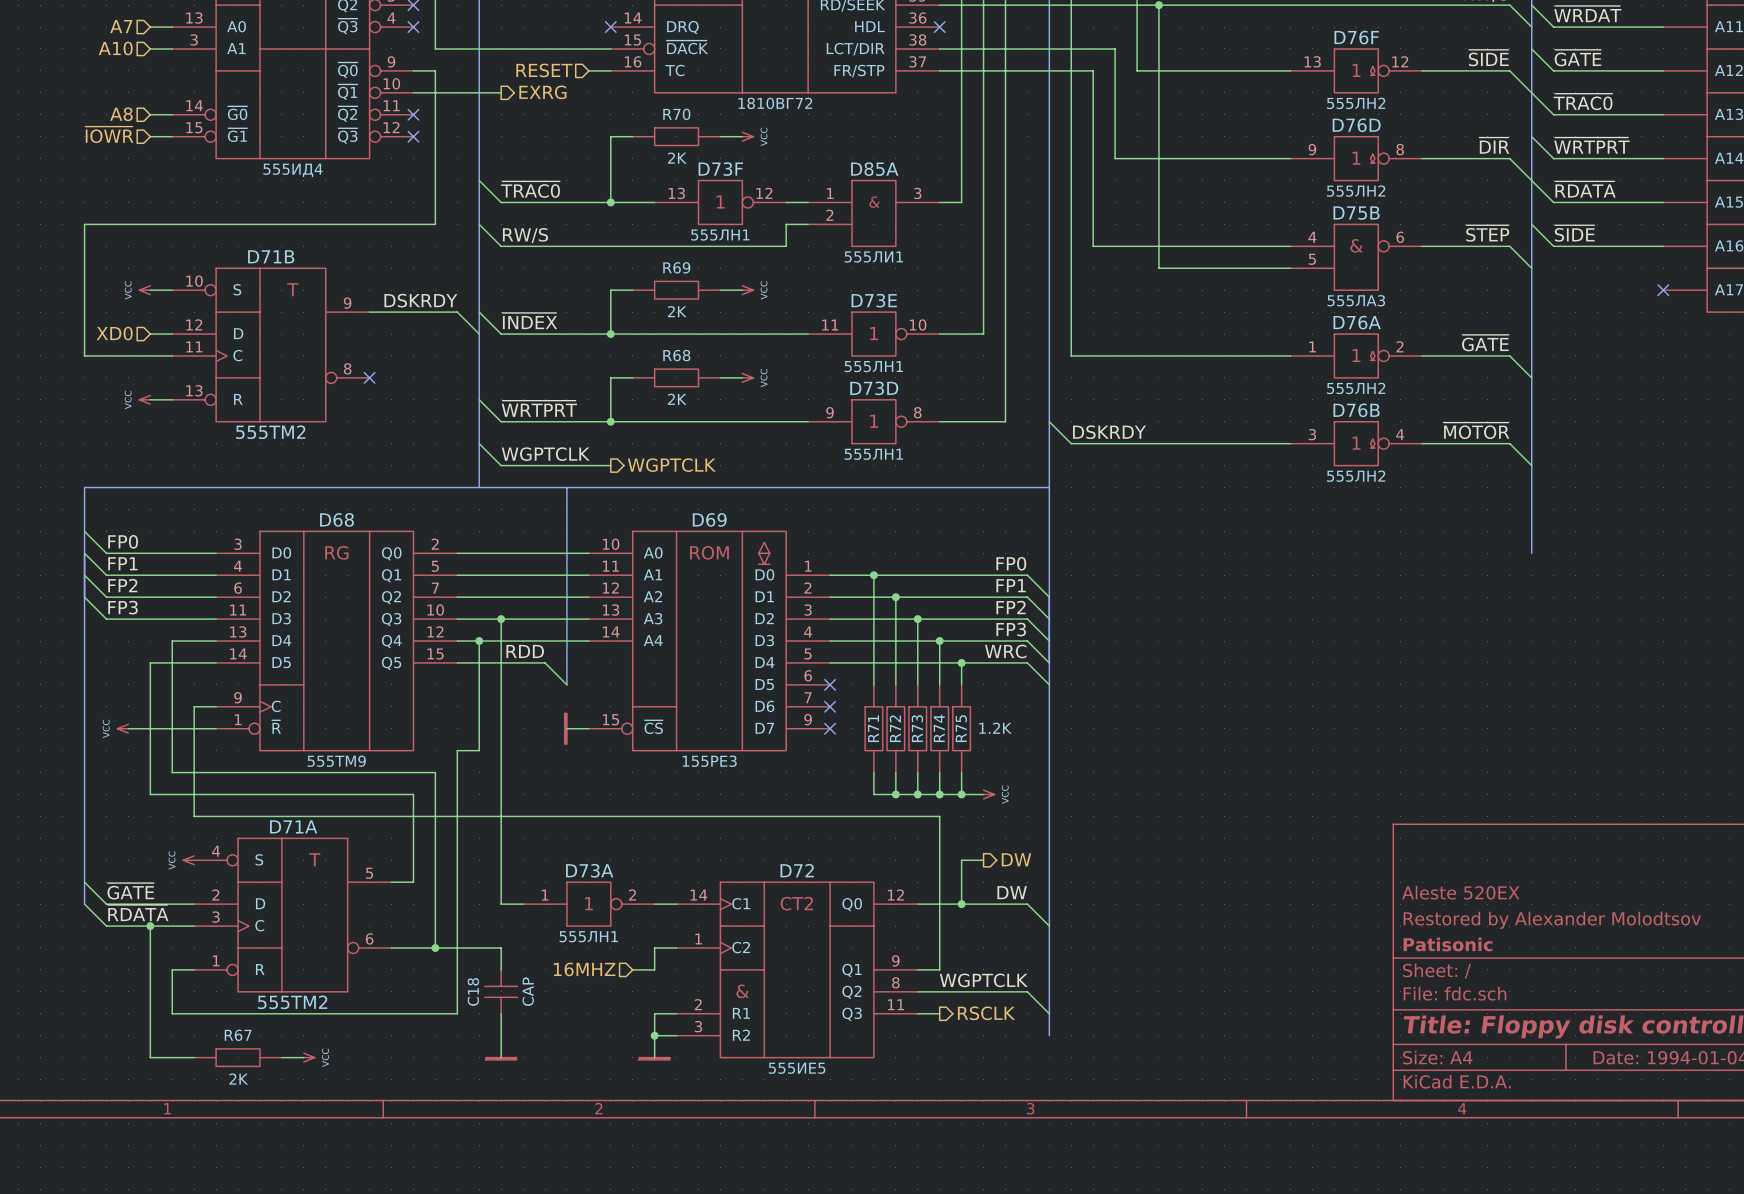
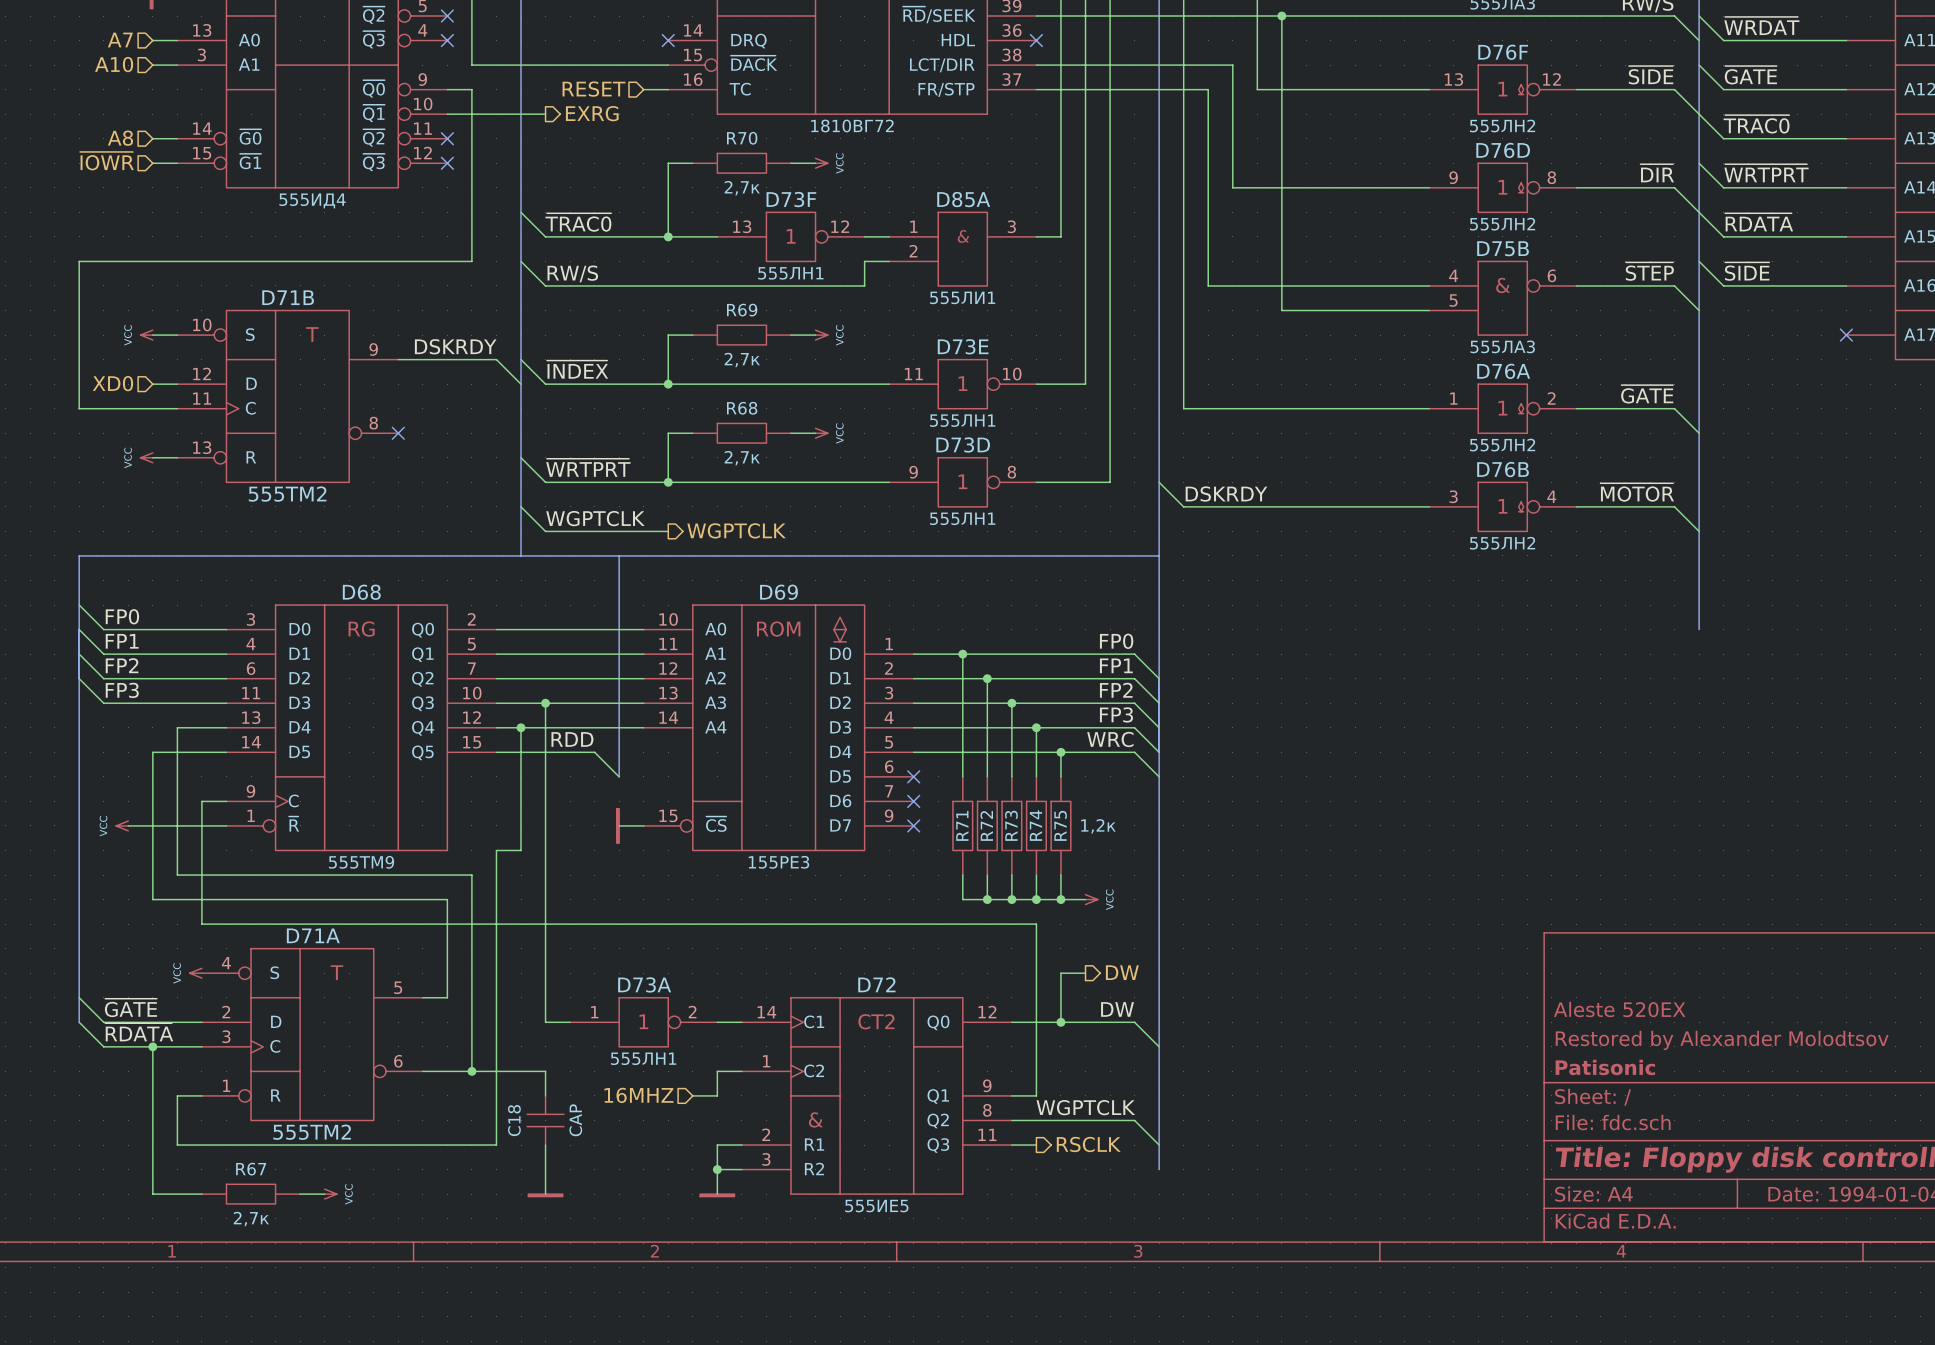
R70 value: 2K (677, 158) -> 2,7к (742, 188)
R69 value: 2K (677, 311) -> 2,7к (742, 360)
R68 value: 2K (677, 399) -> 2,7к (742, 458)
R75 value: 1.2K (995, 728) -> 1,2к (1098, 826)
R67 value: 2K (238, 1079) -> 2,7к (251, 1219)

